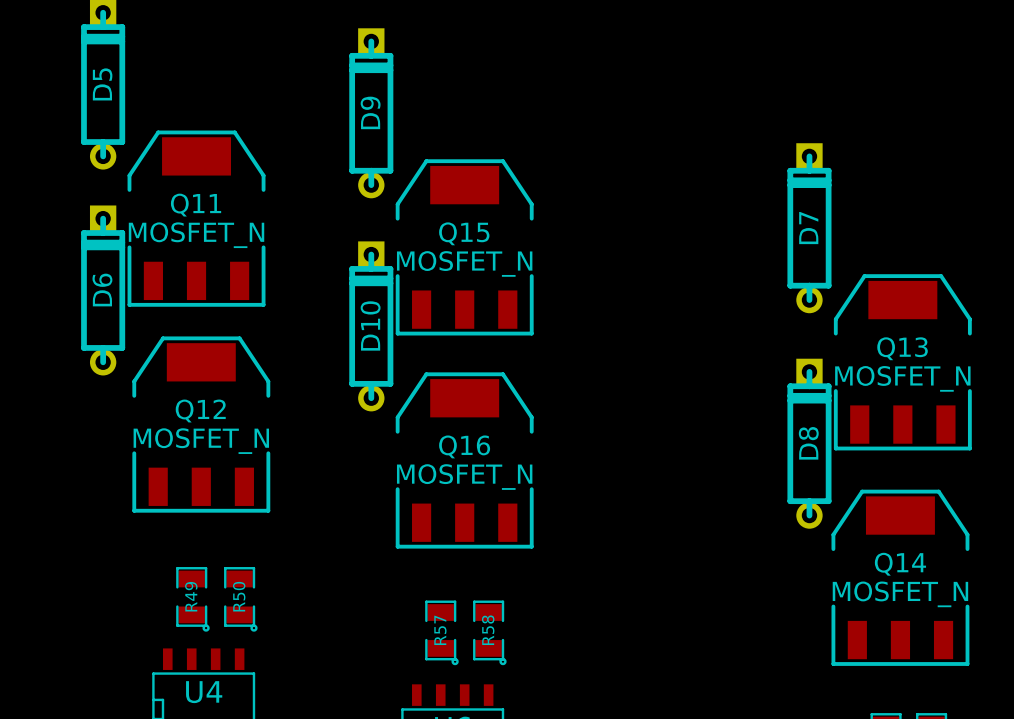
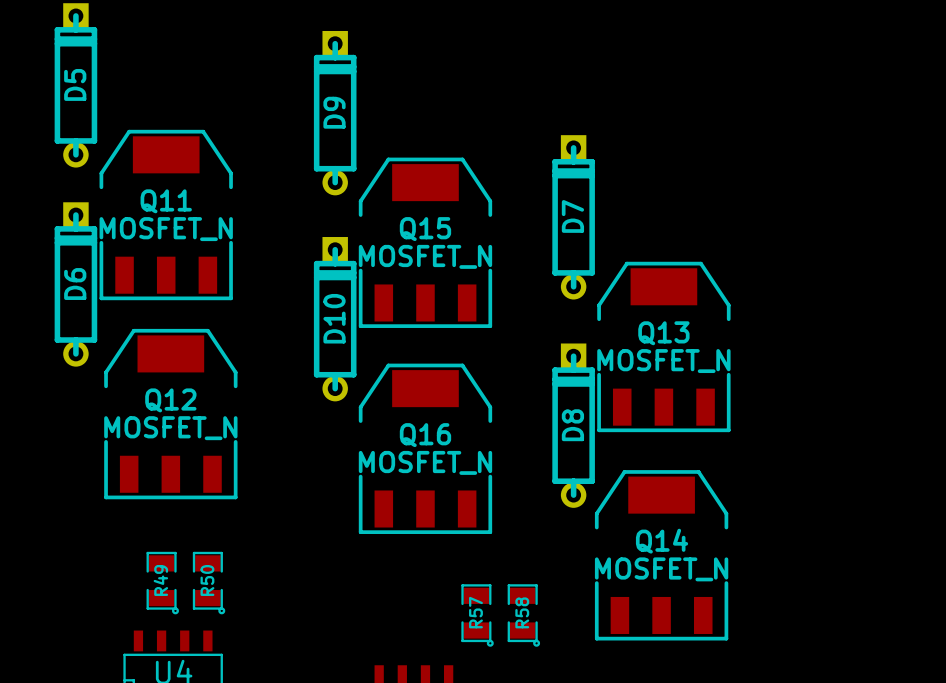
D7 position: (809, 228) -> (573, 217)
Q13 position: (902, 362) -> (663, 346)
D8 position: (809, 443) -> (573, 425)
Q14 position: (900, 577) -> (661, 555)
R57 position: (441, 632) -> (477, 615)
R58 position: (489, 632) -> (523, 615)

